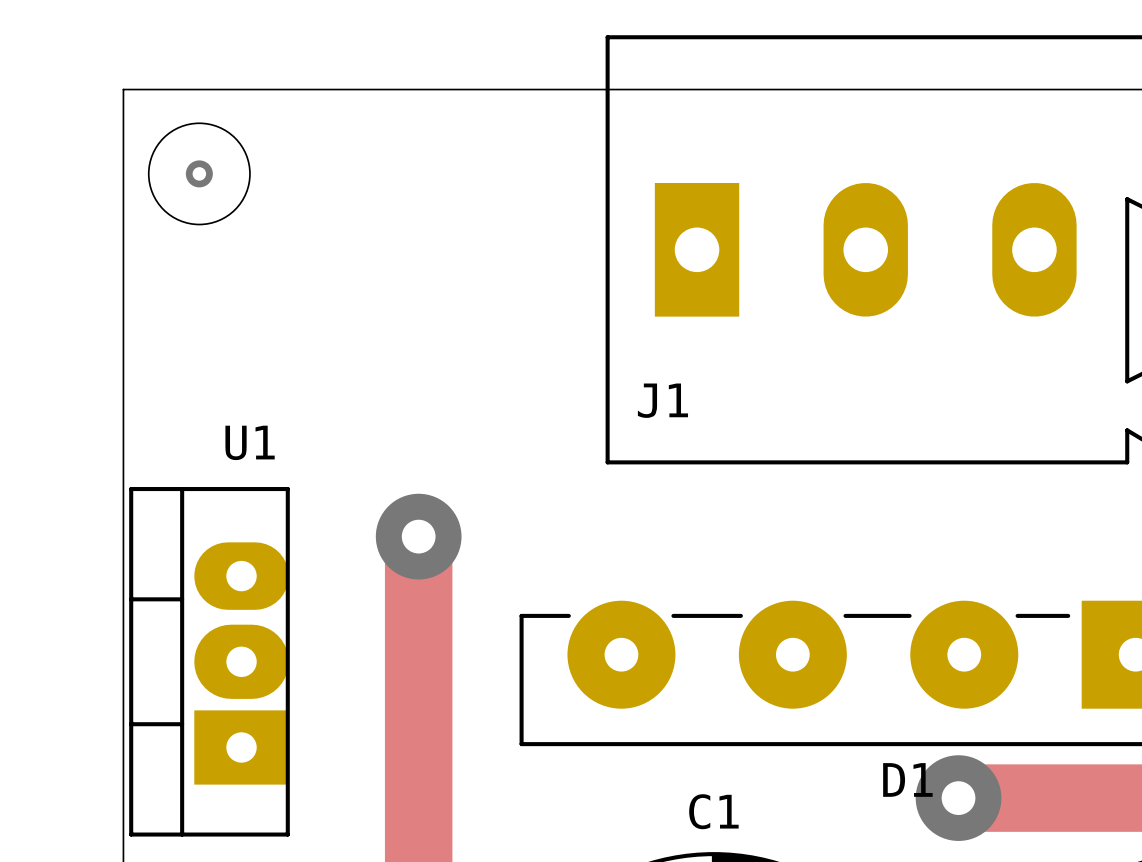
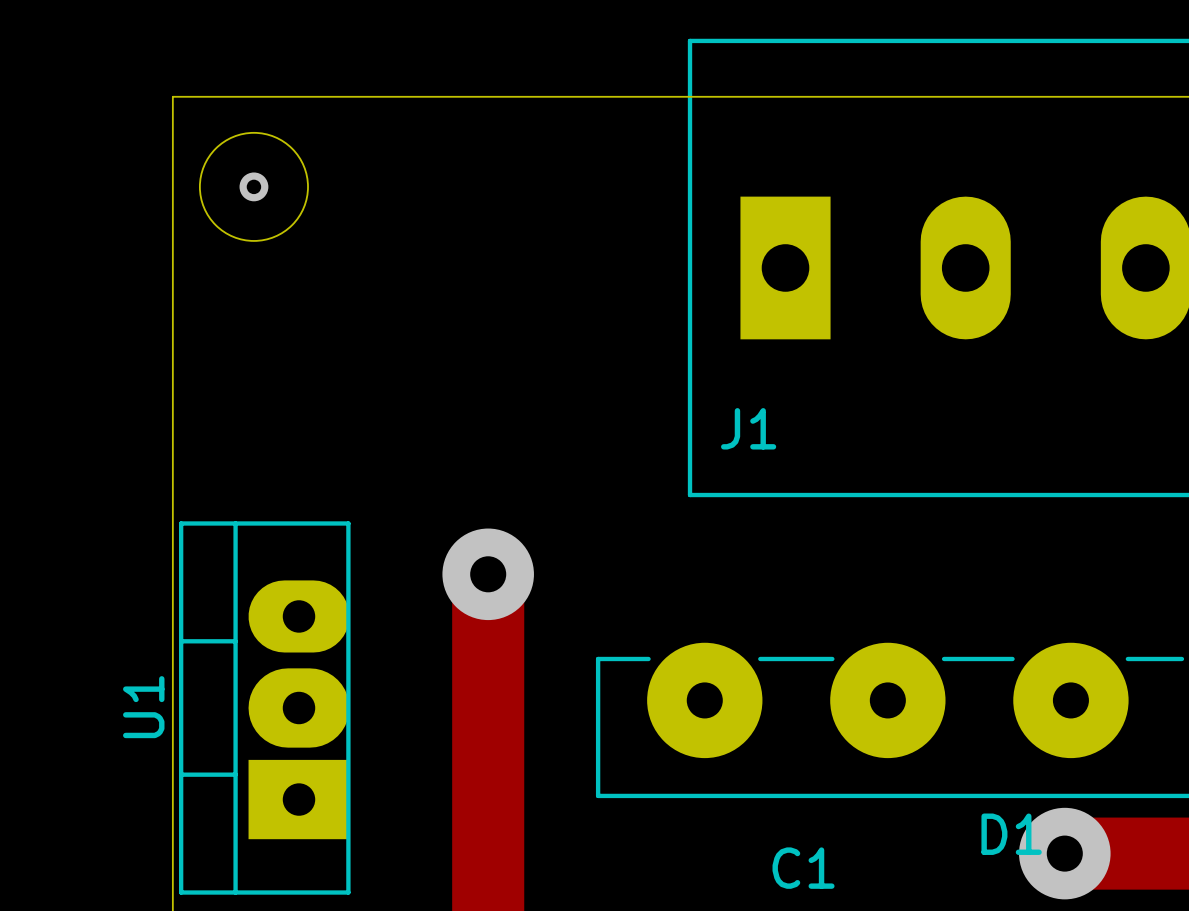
U1 name rotation: 0° (250, 442) -> 90° counterclockwise (143, 707)
U1 name position: U1 (250, 442) -> U1 (143, 707)

